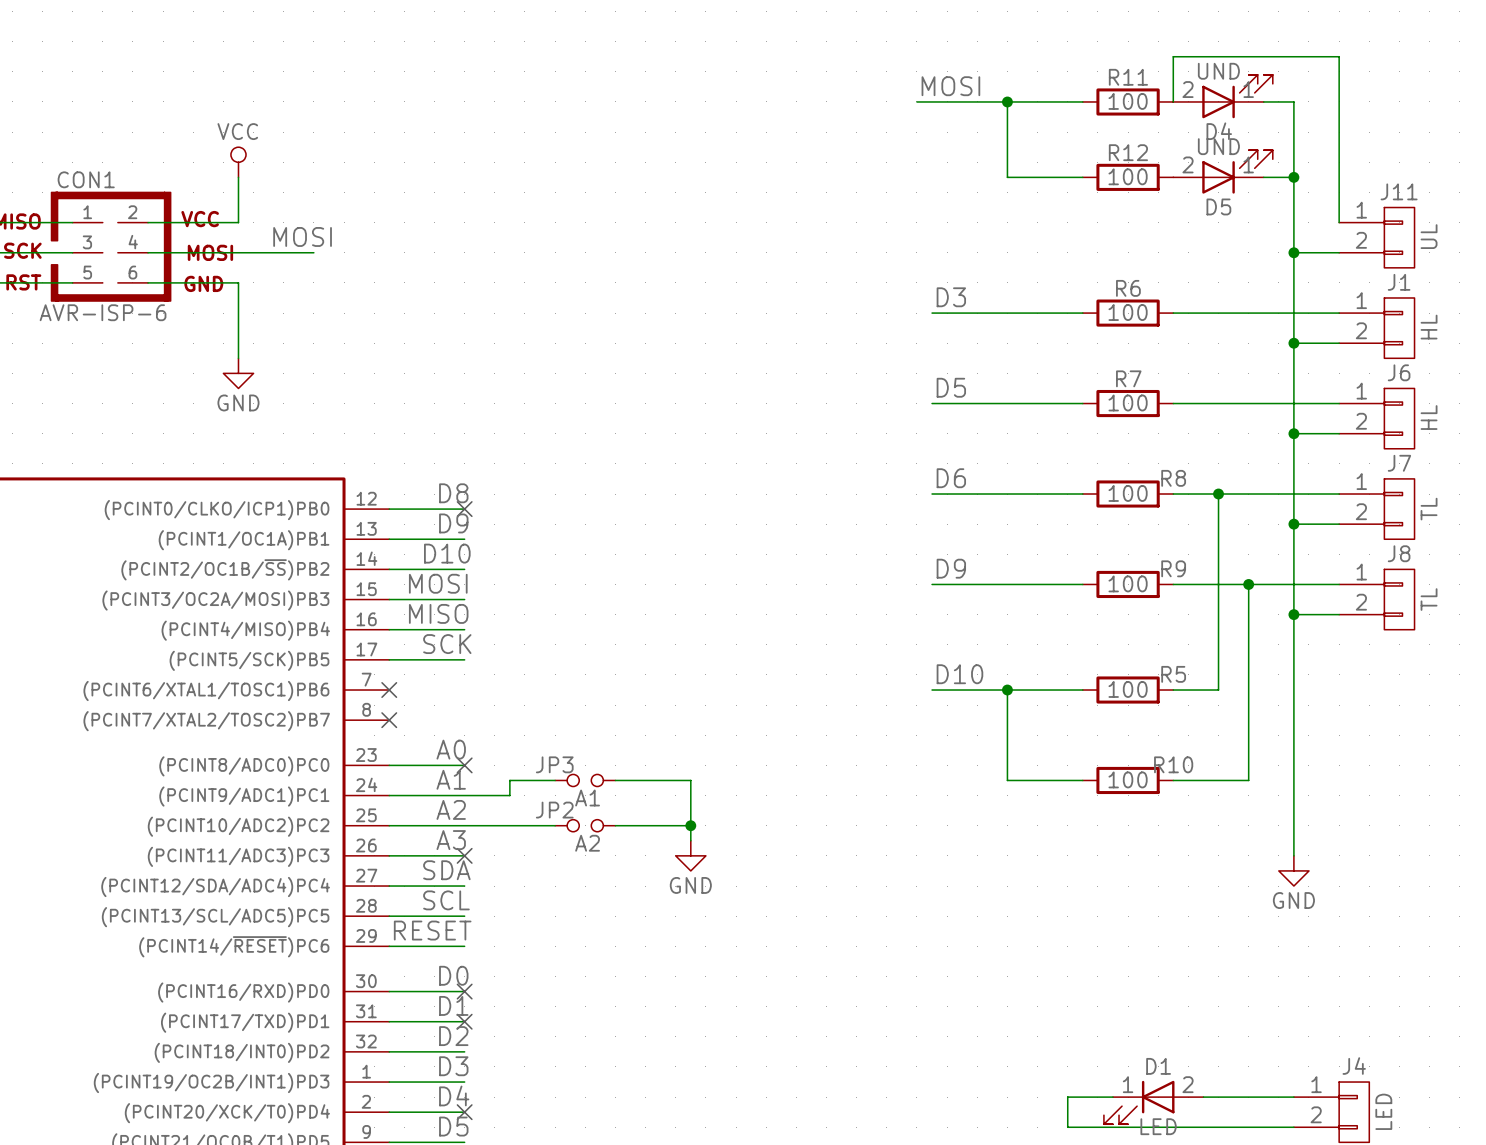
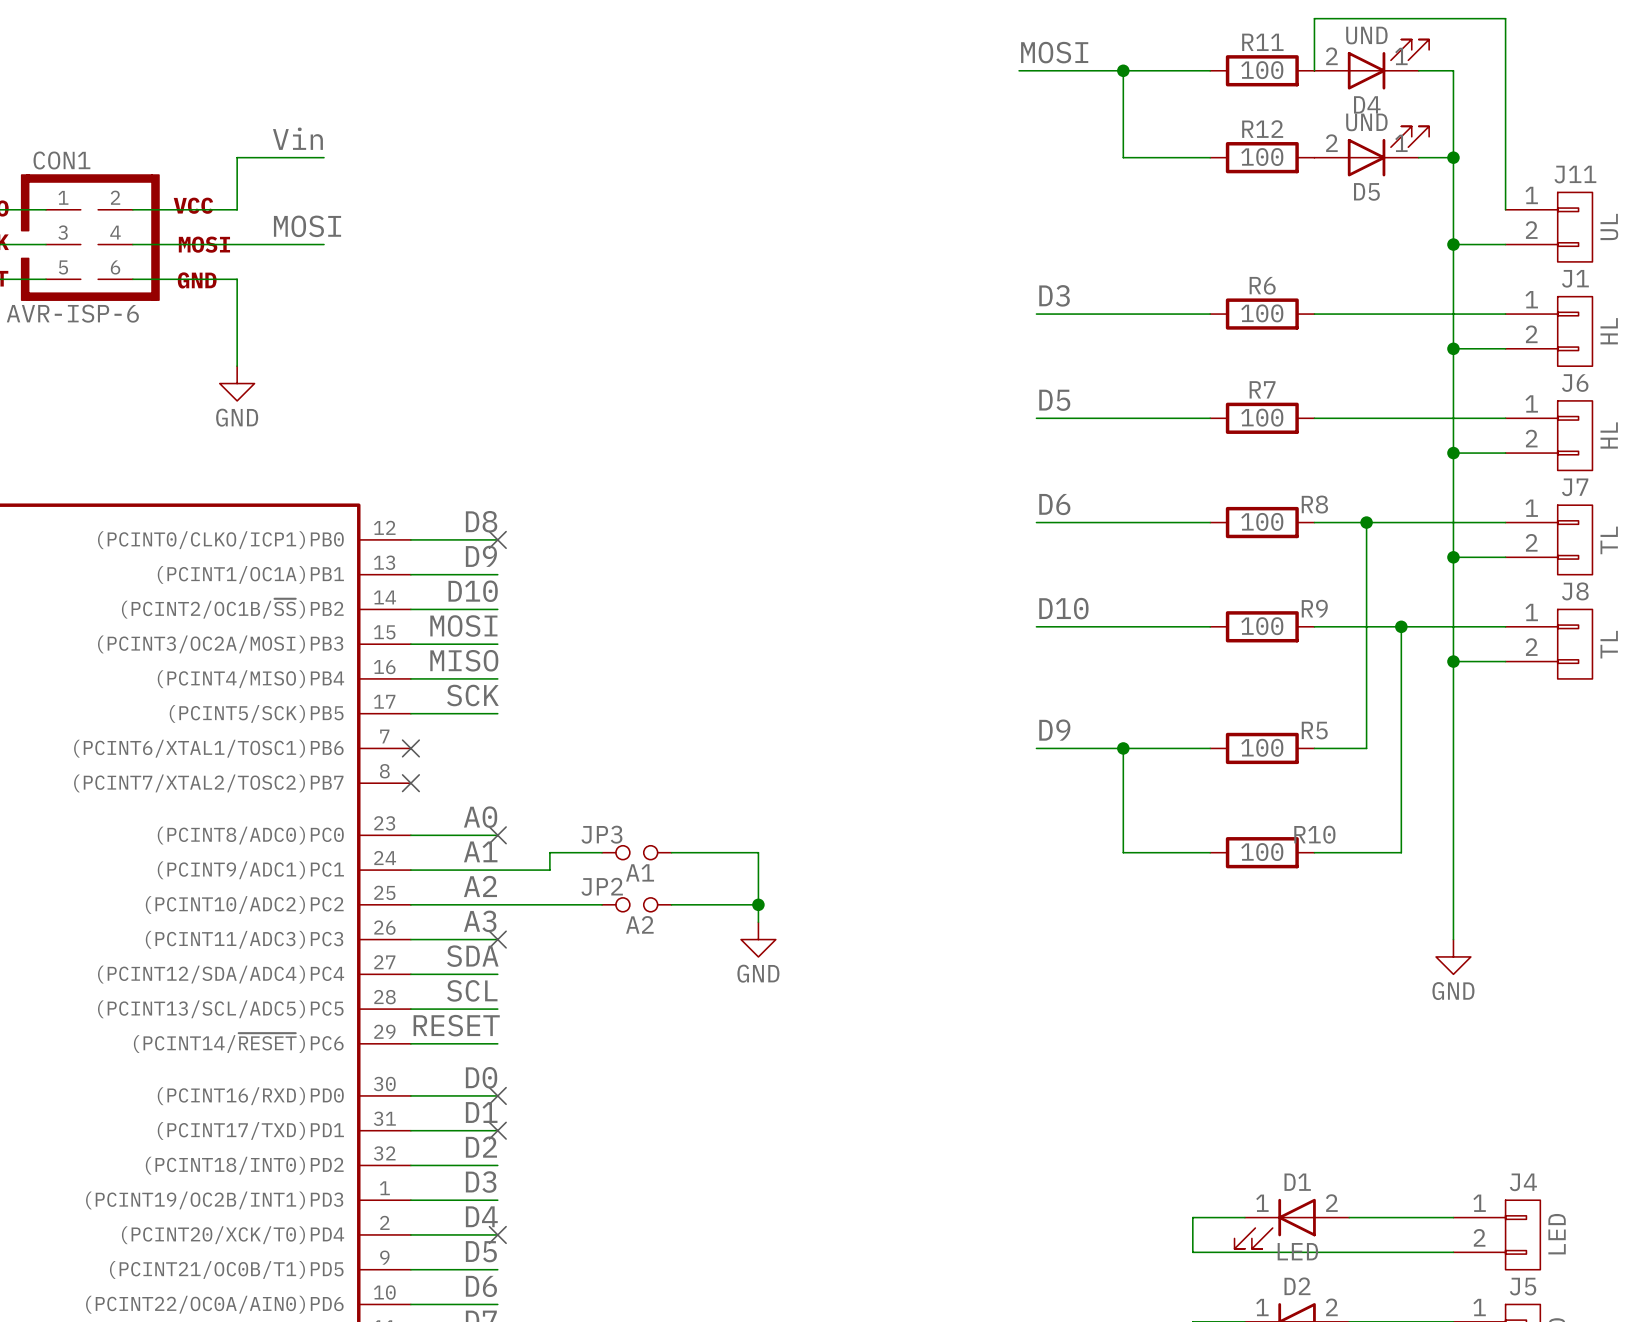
label: none -> Vin (297, 138)
power symbol: VCC (238, 162) -> none
wire: none -> (237, 157) (324, 157)
label: D9 (951, 568) -> D10 (1063, 608)
label: D10 (959, 674) -> D9 (1054, 730)

